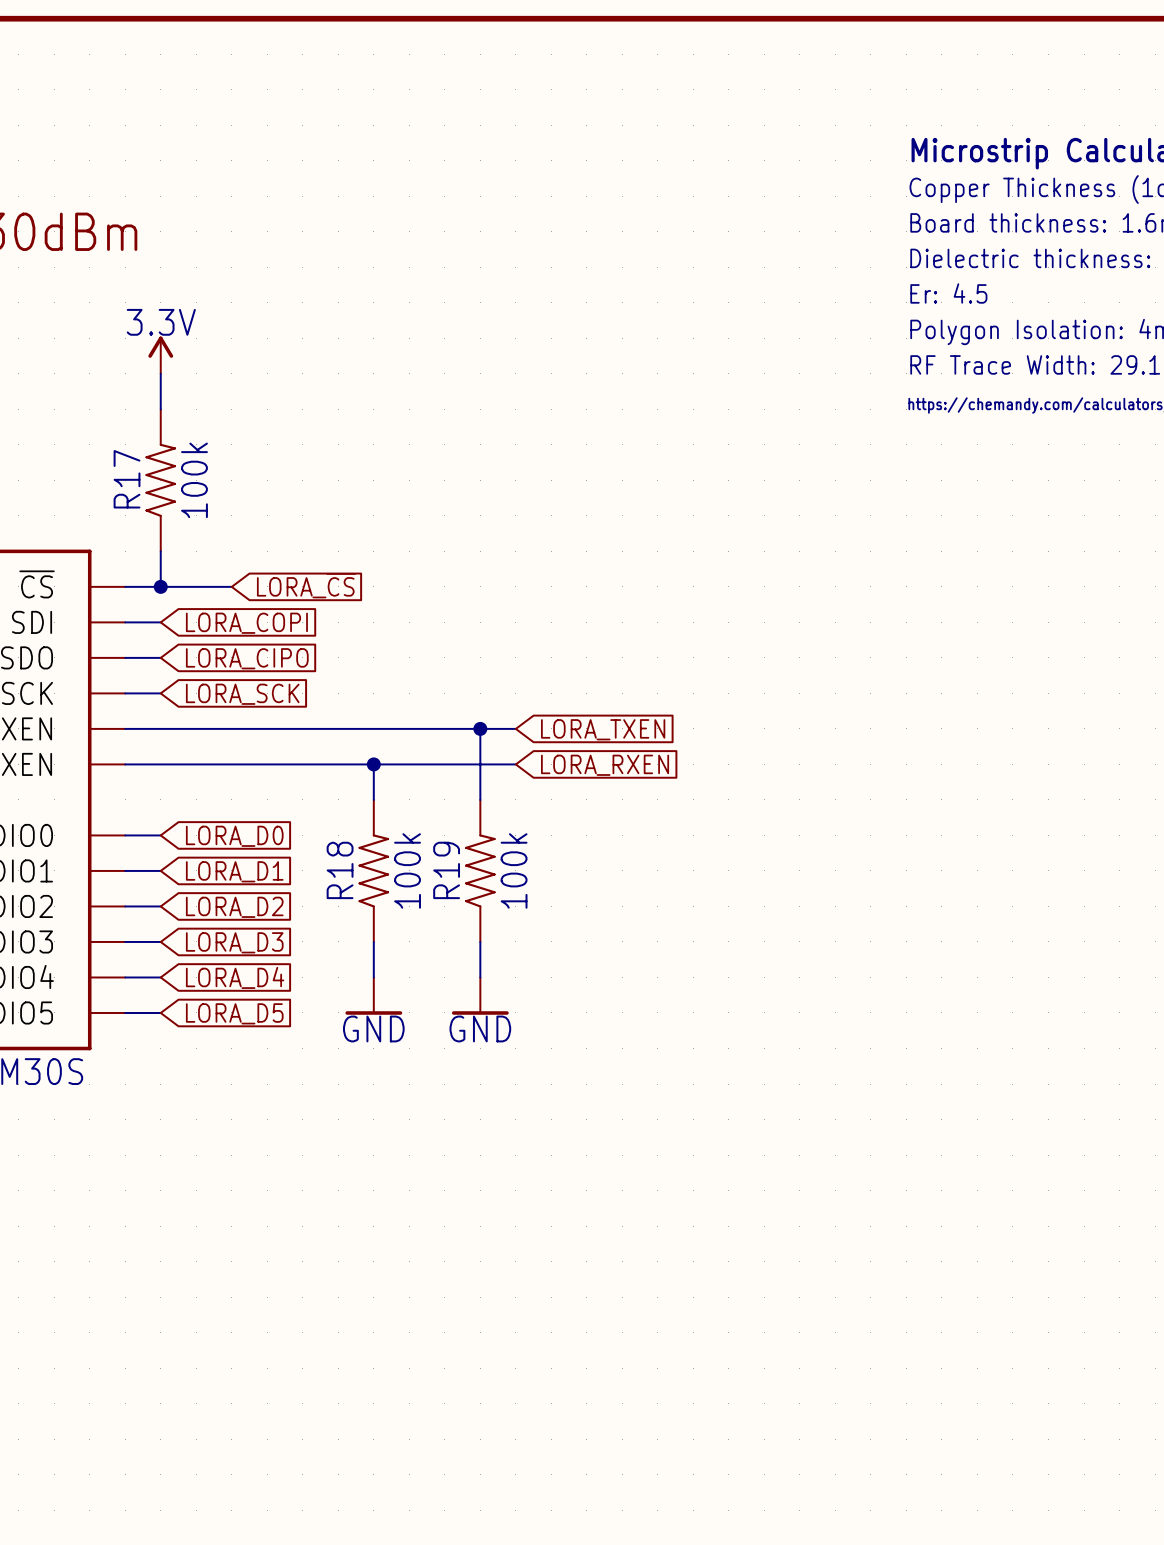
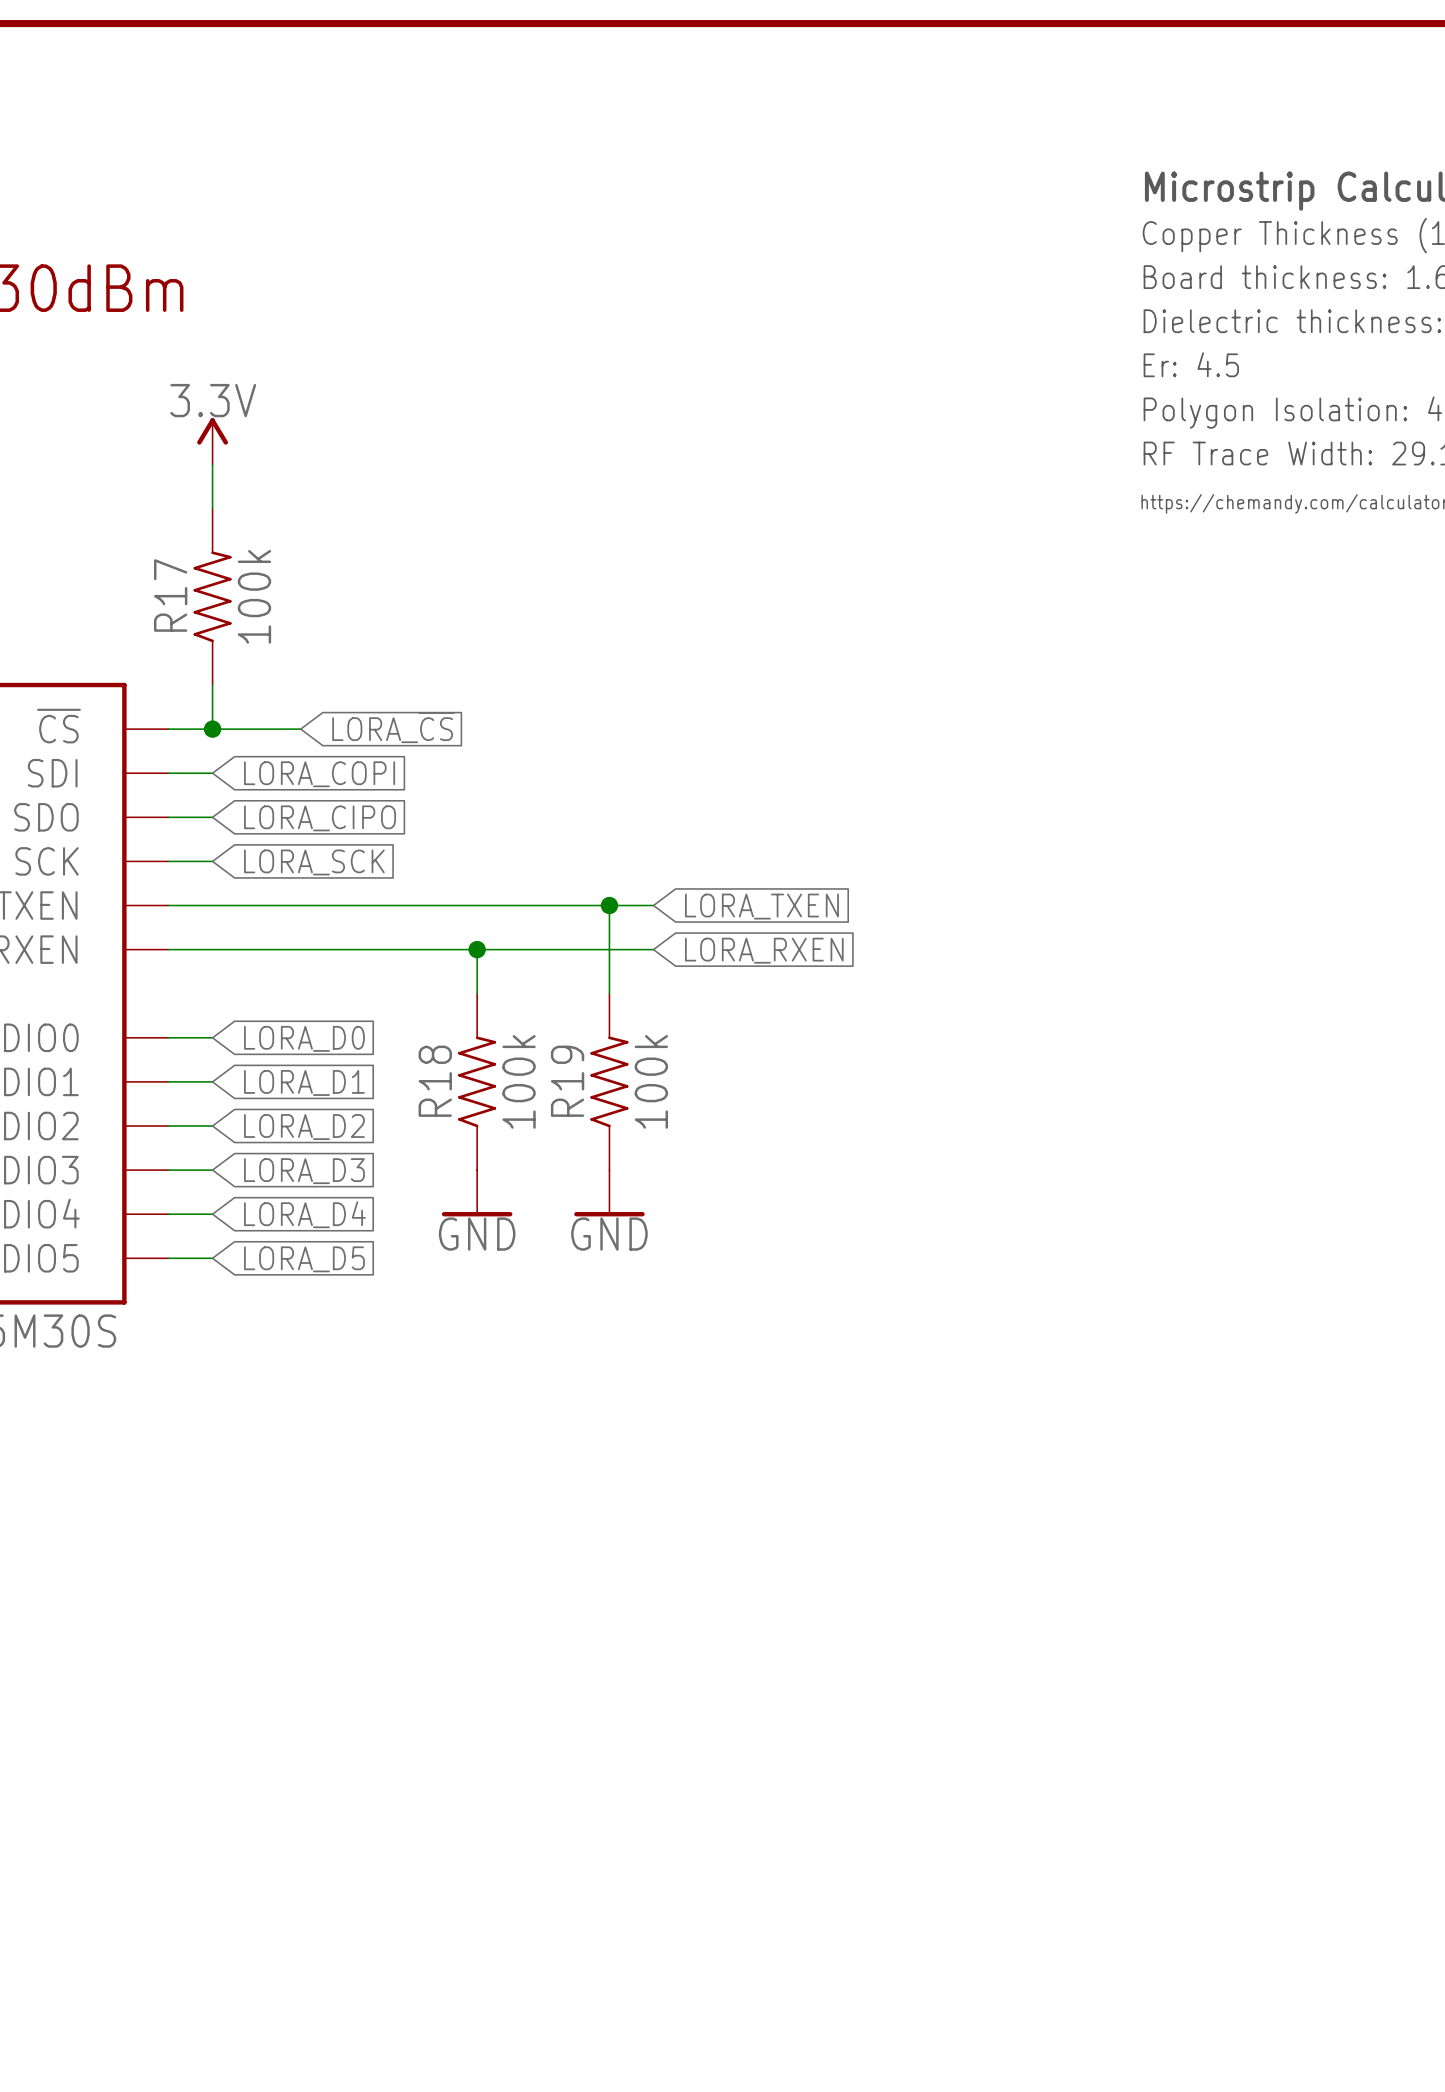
power symbol position: GND (373, 996) -> GND (477, 1193)
power symbol position: GND (480, 996) -> GND (609, 1193)

